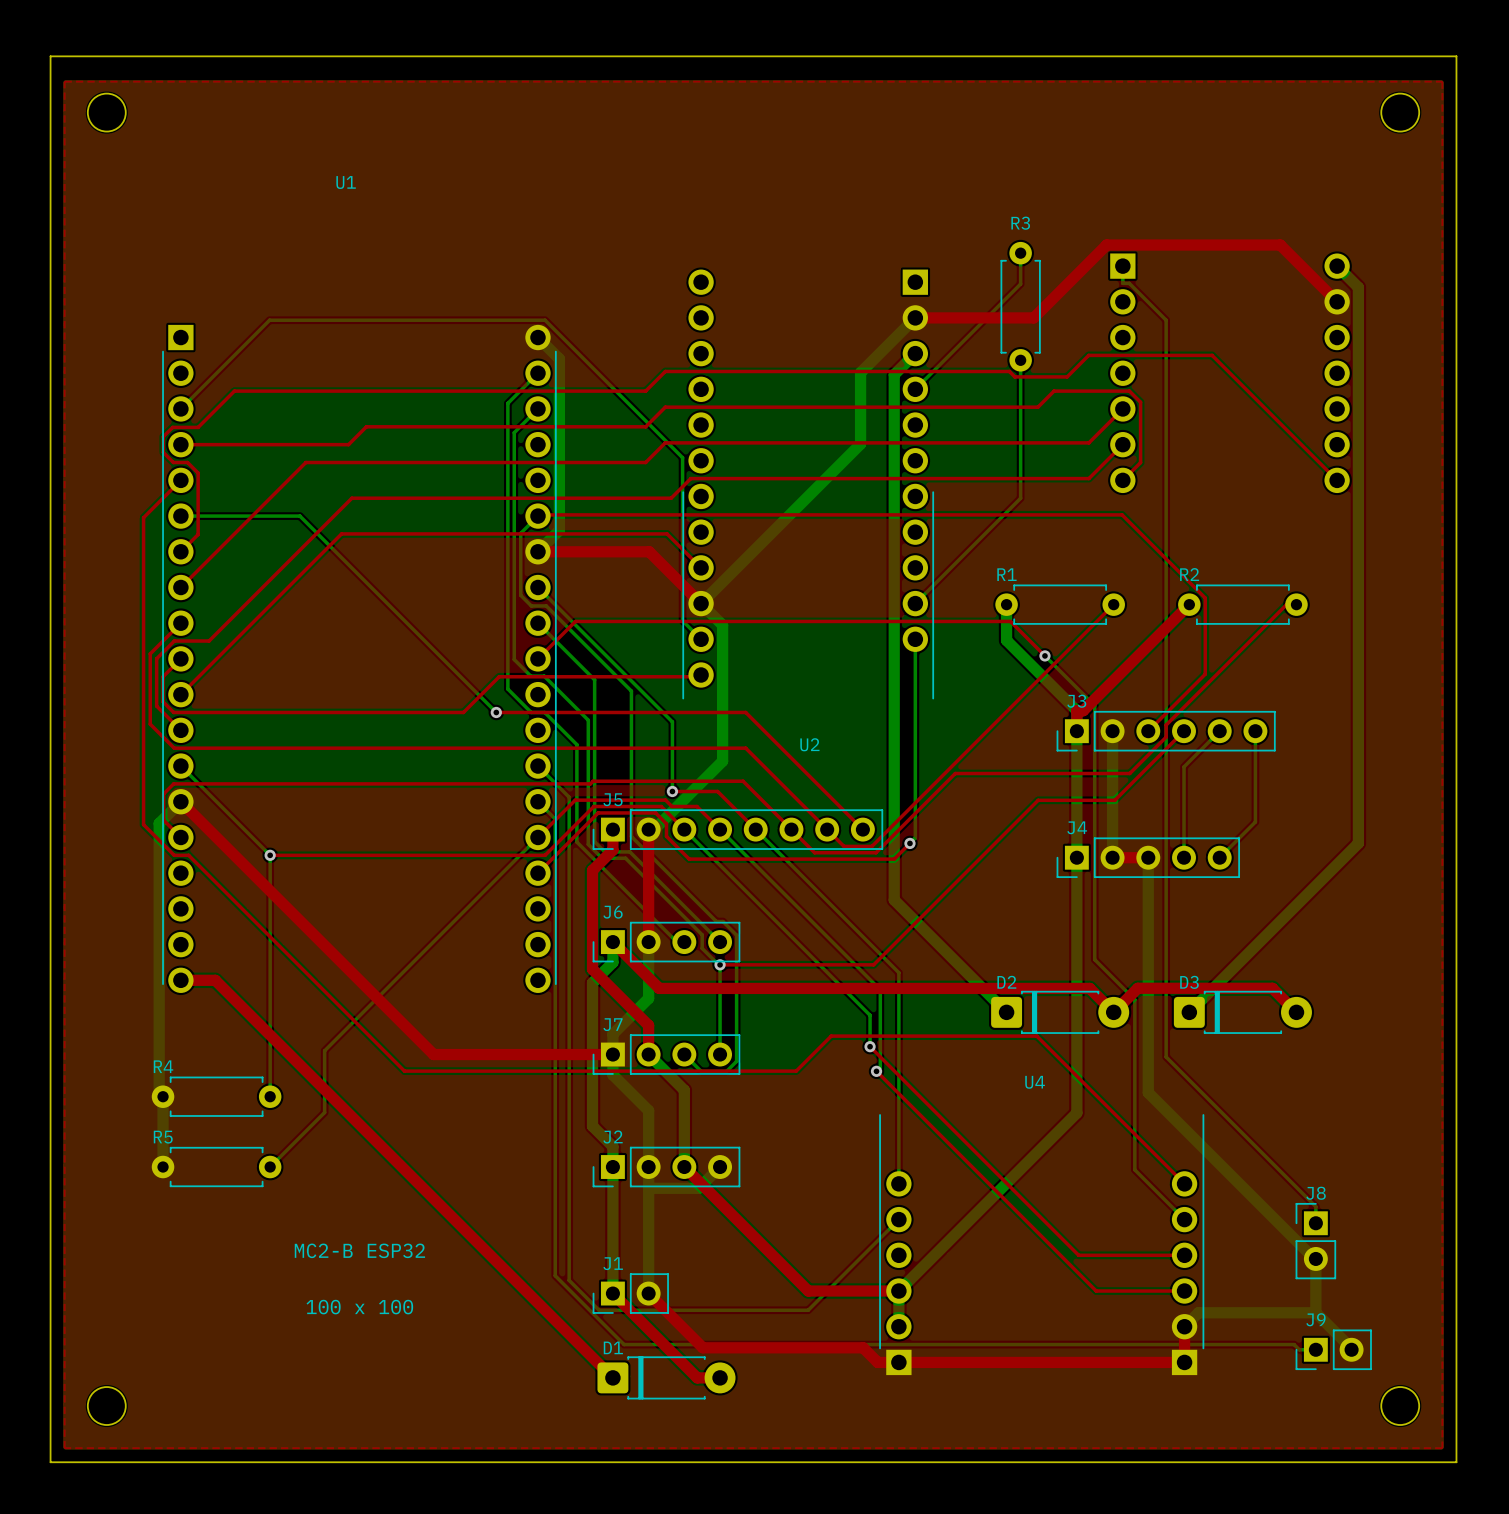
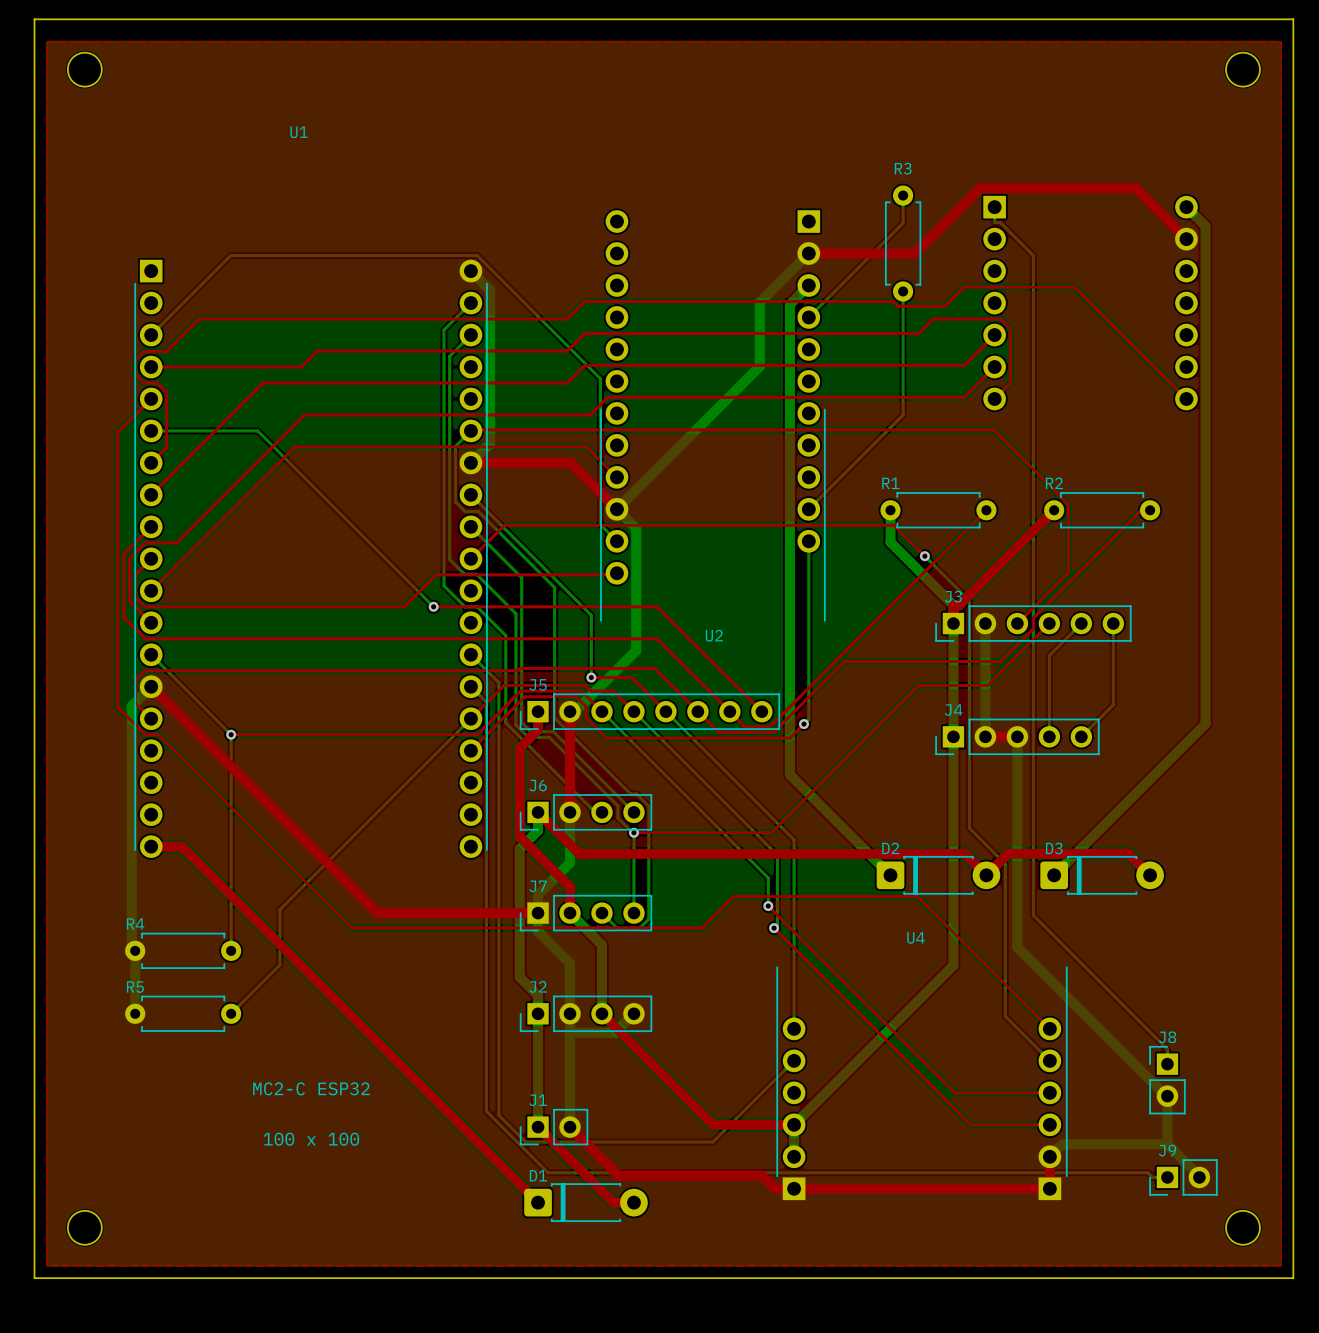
U2 footprint: [682, 269, 935, 700] -> [600, 210, 826, 622]
text: MC2-B ESP32 (359, 1250) -> MC2-C ESP32 (311, 1088)

